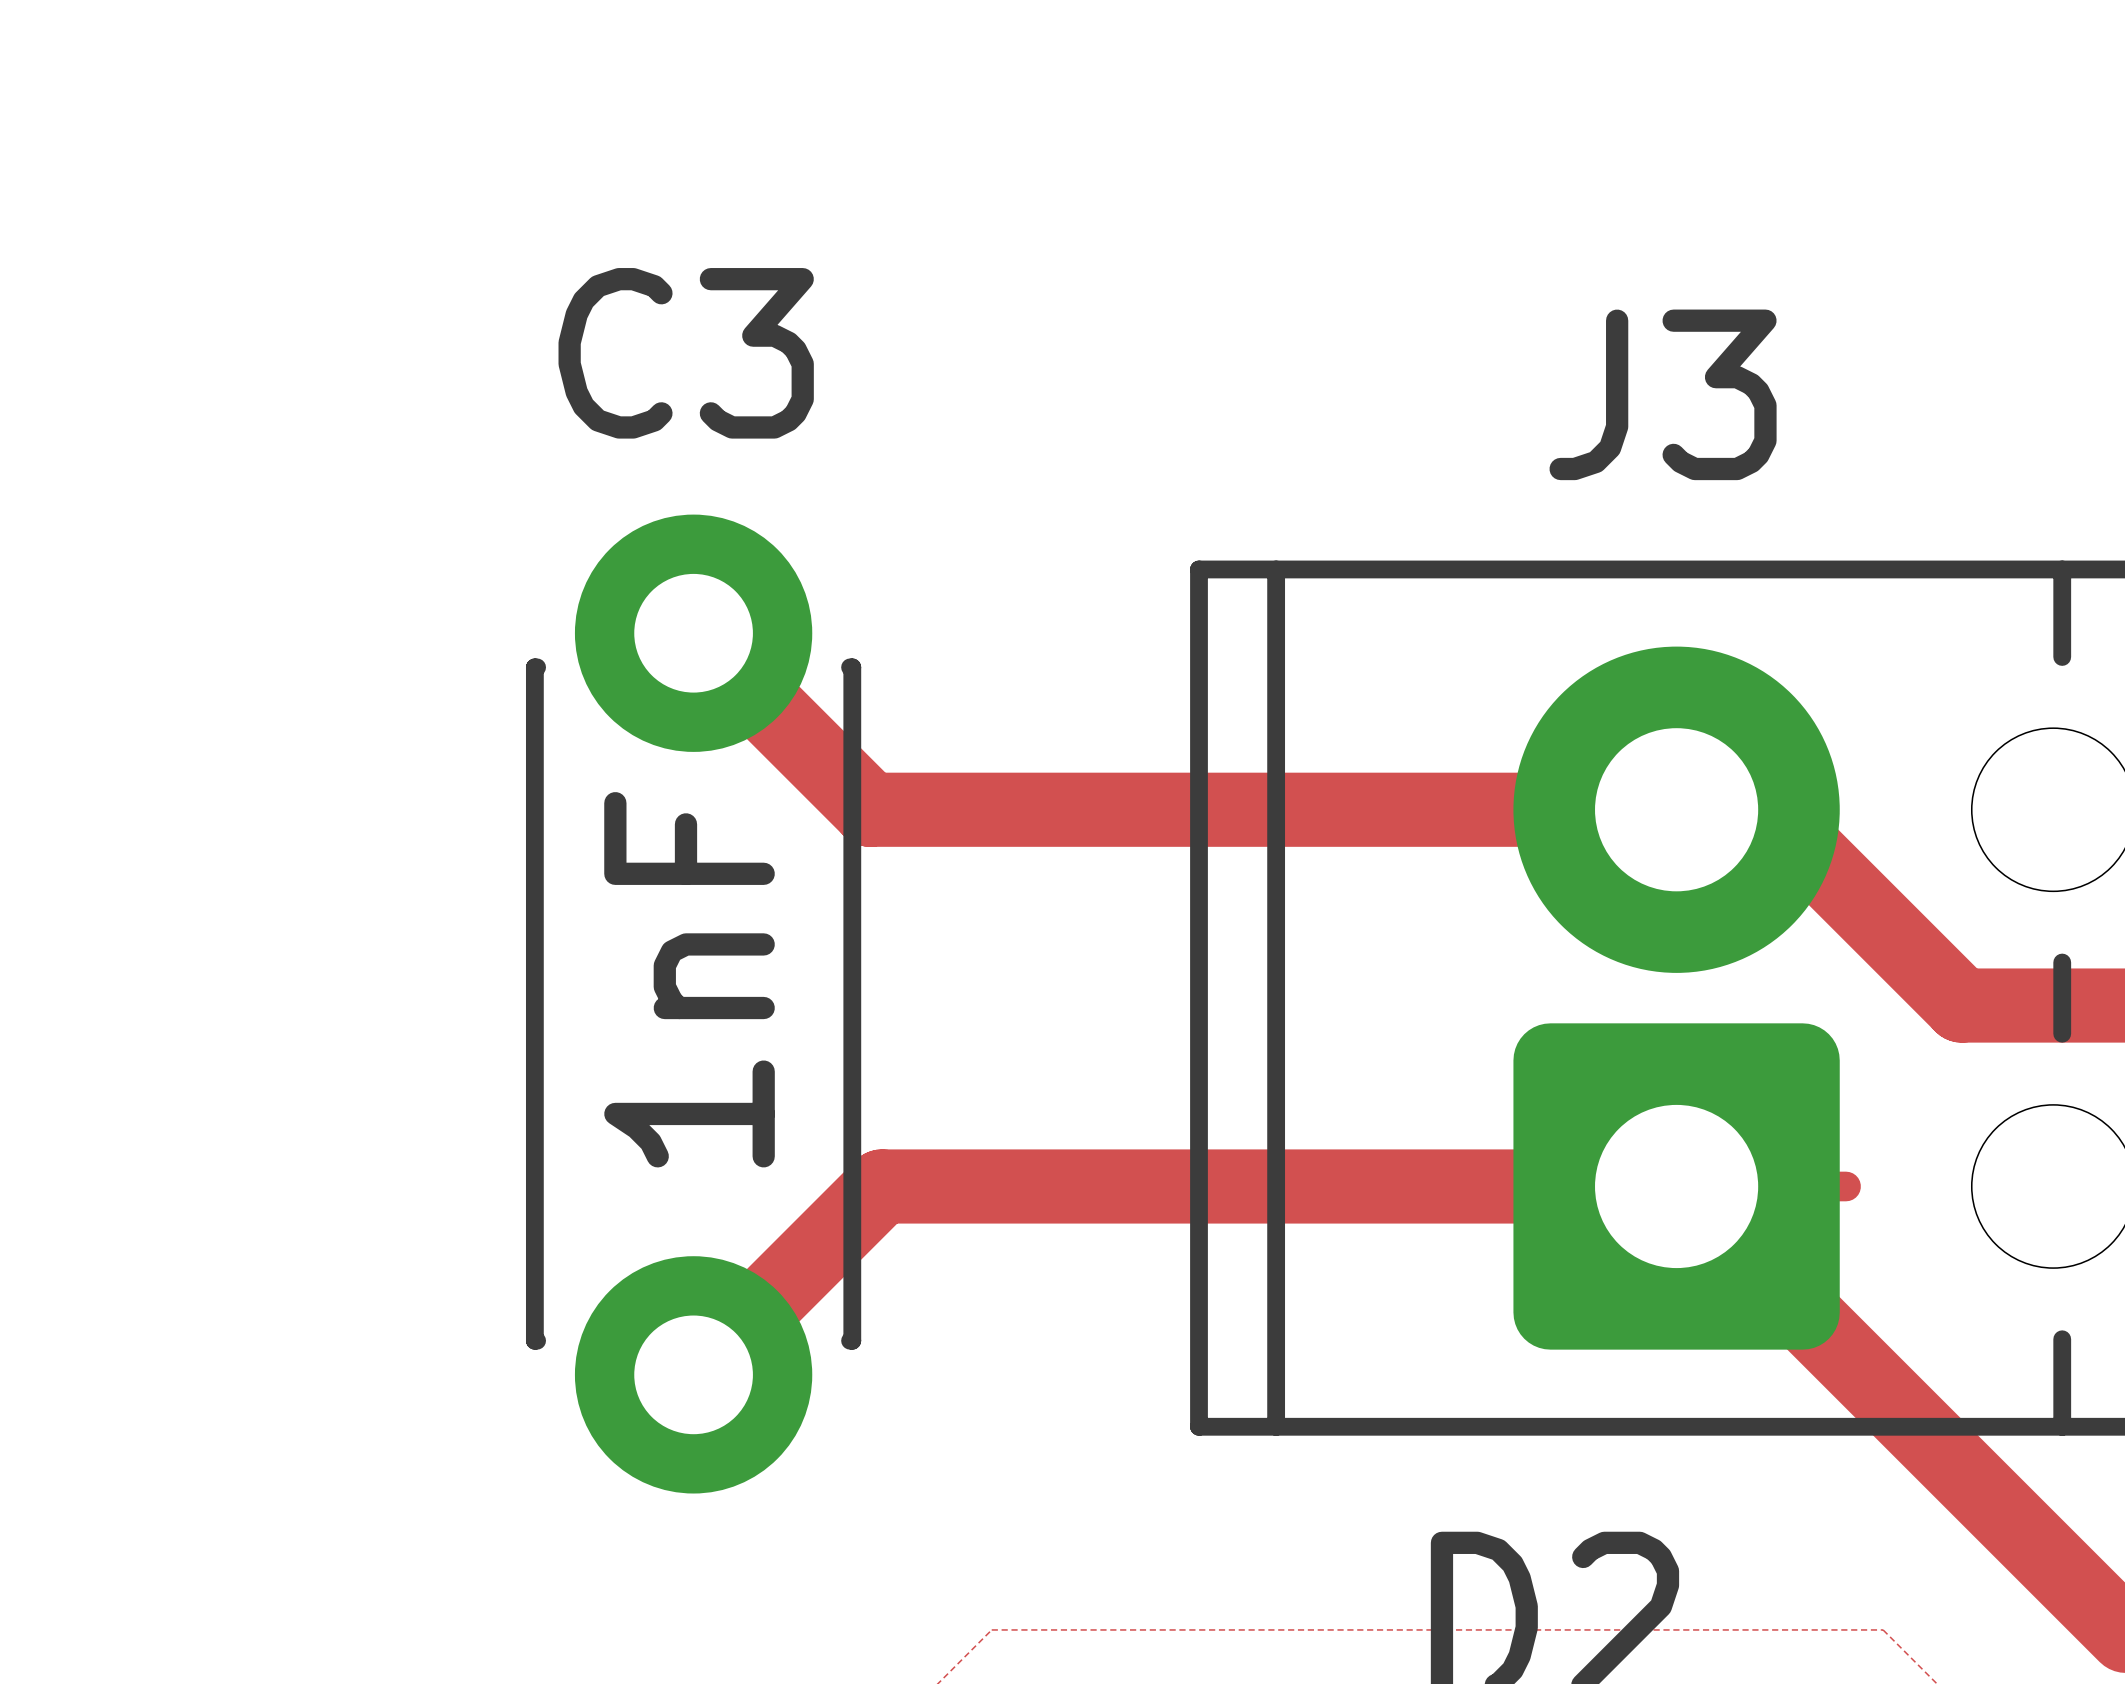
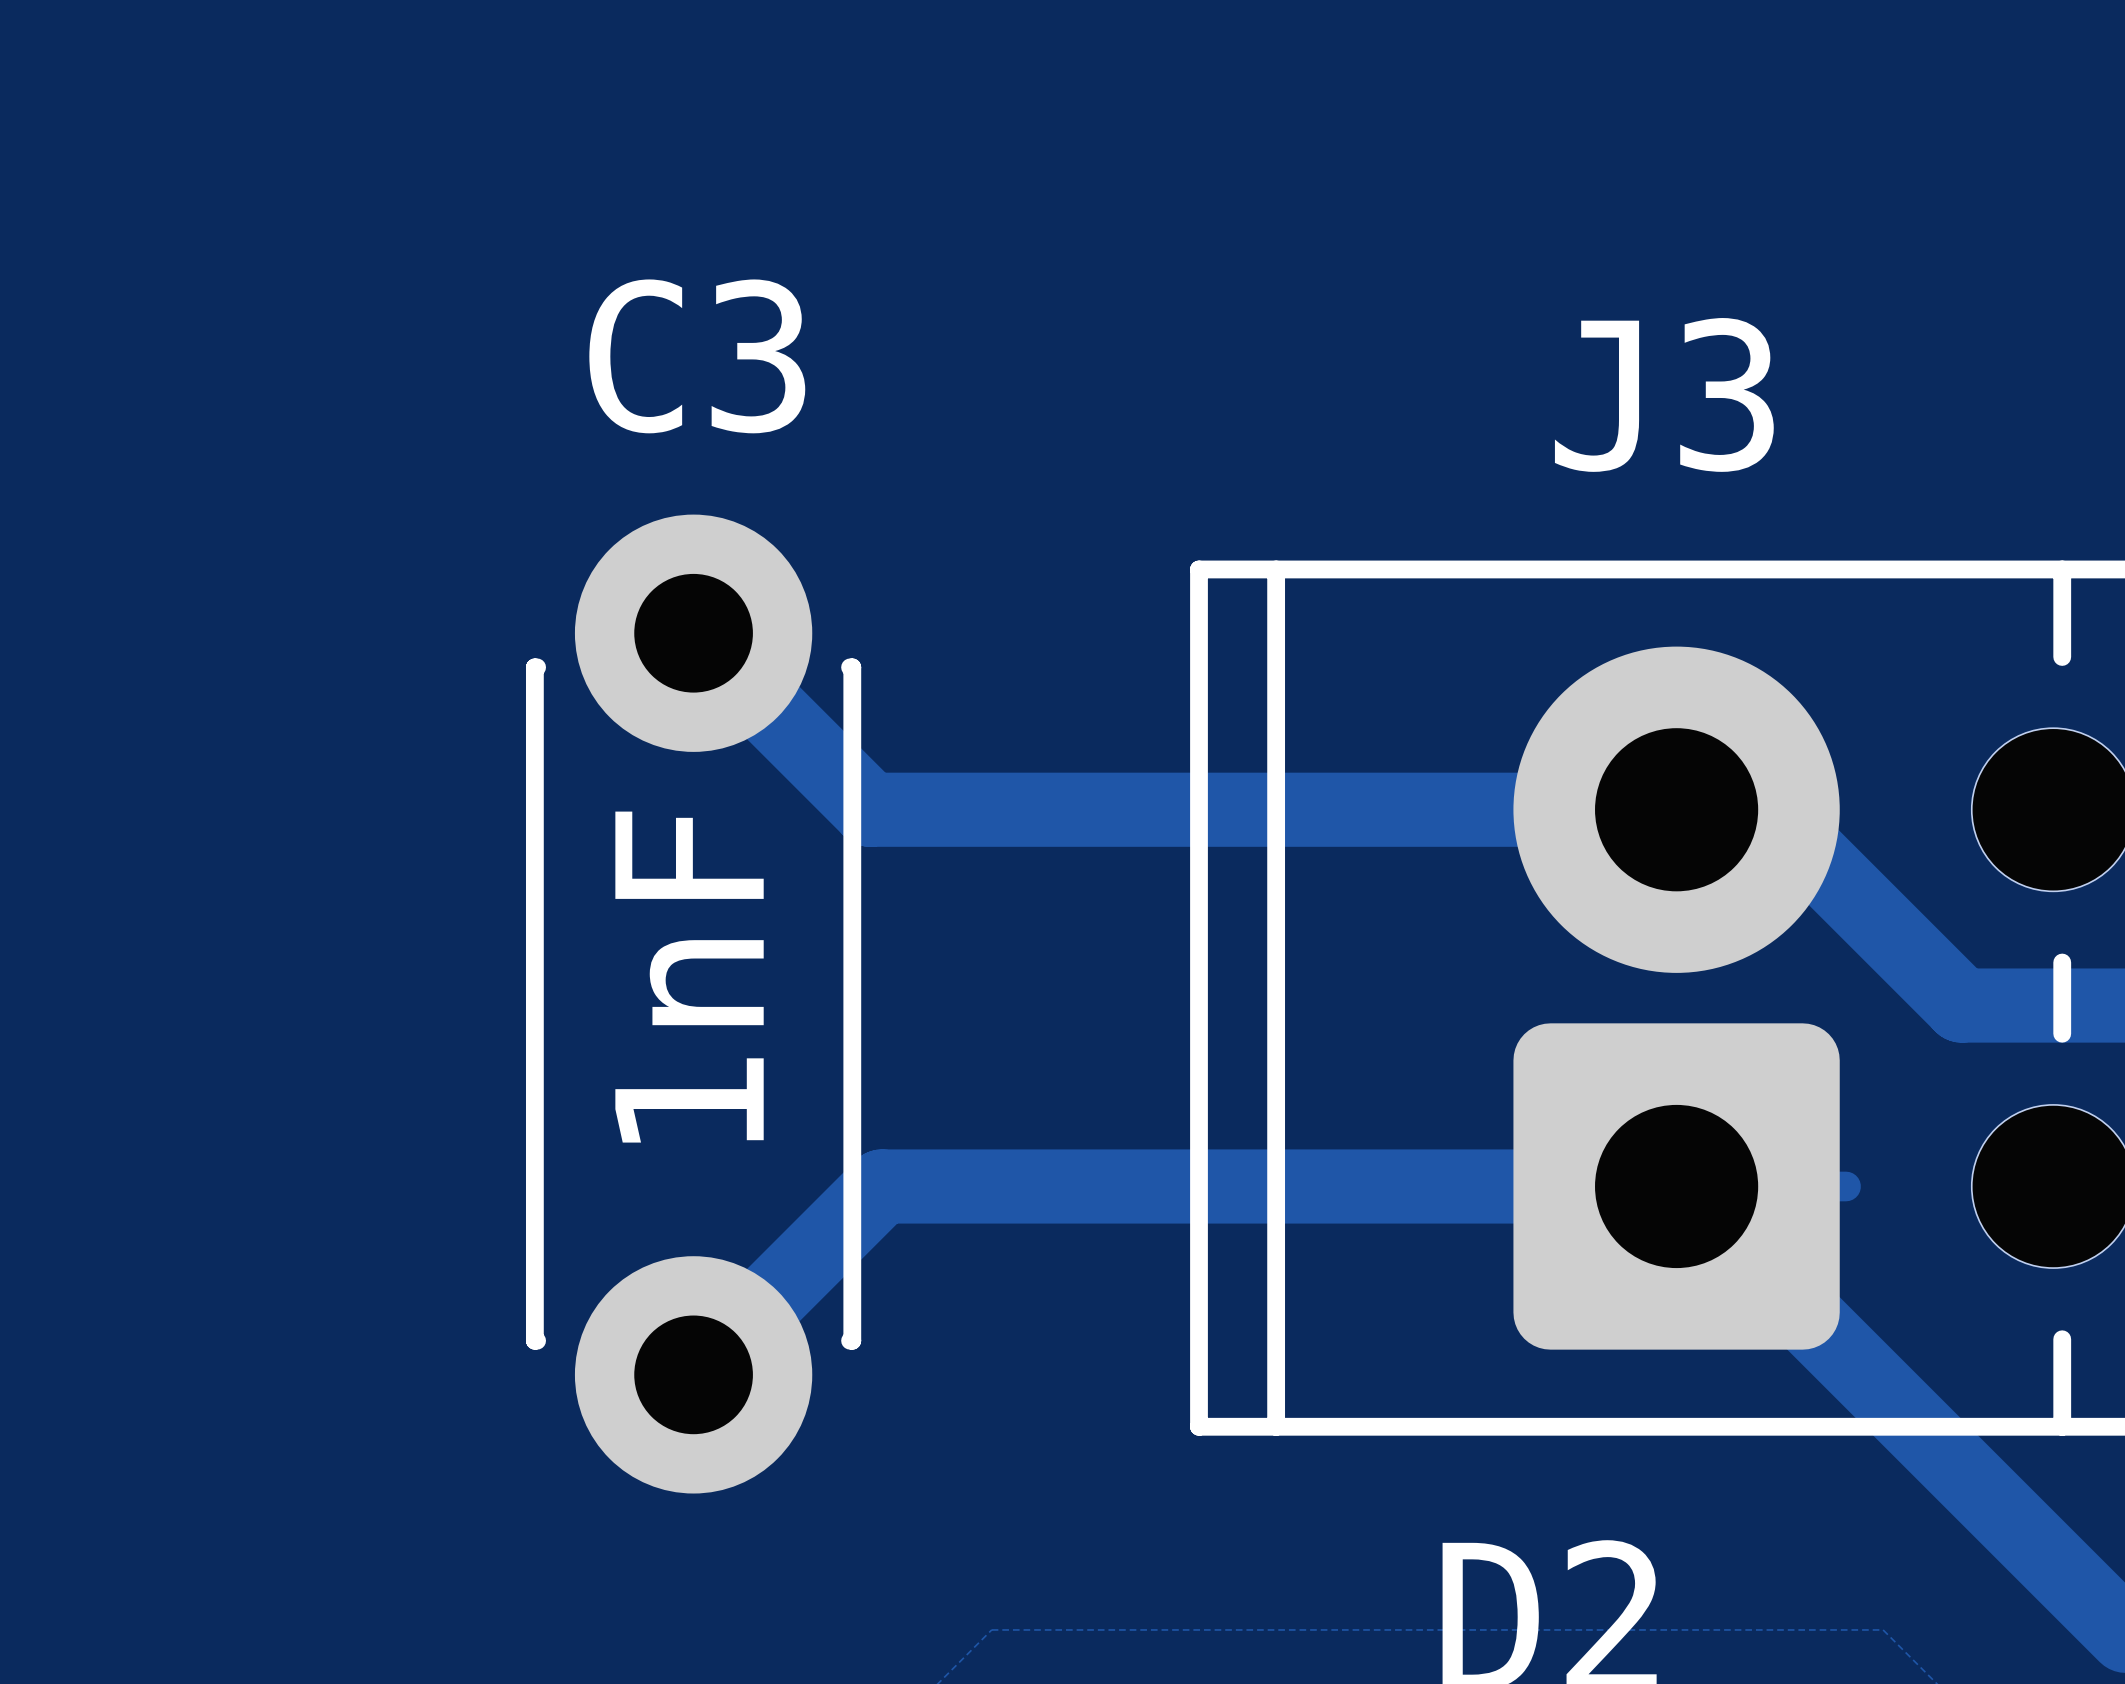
C3 name position: C3 (686, 353) -> C3 (697, 356)

